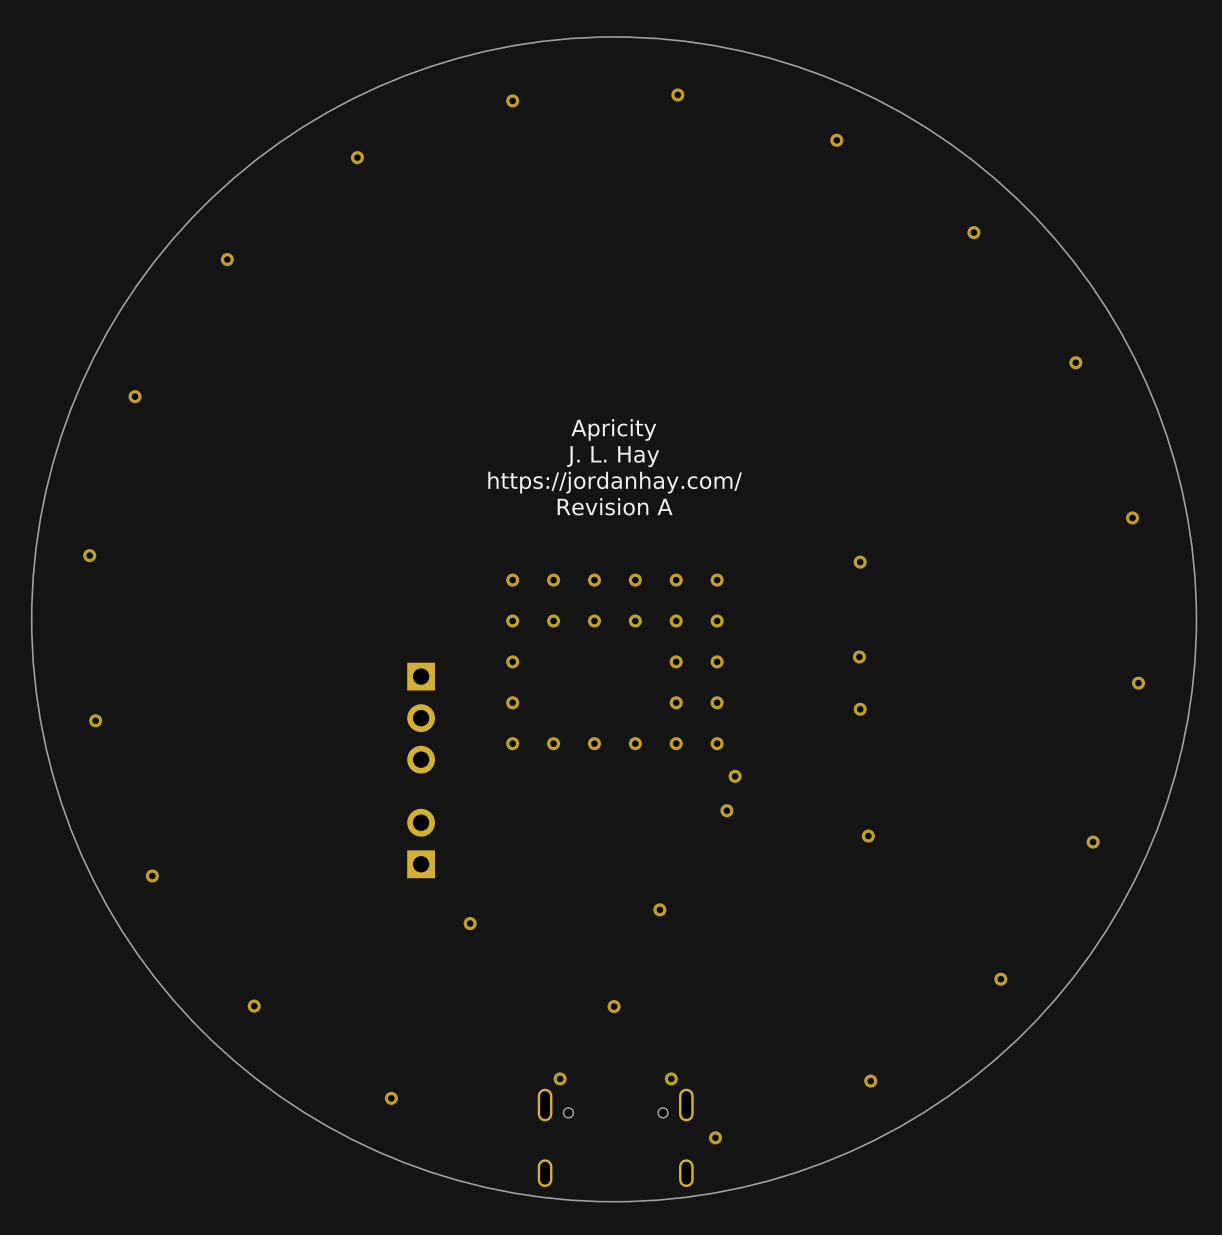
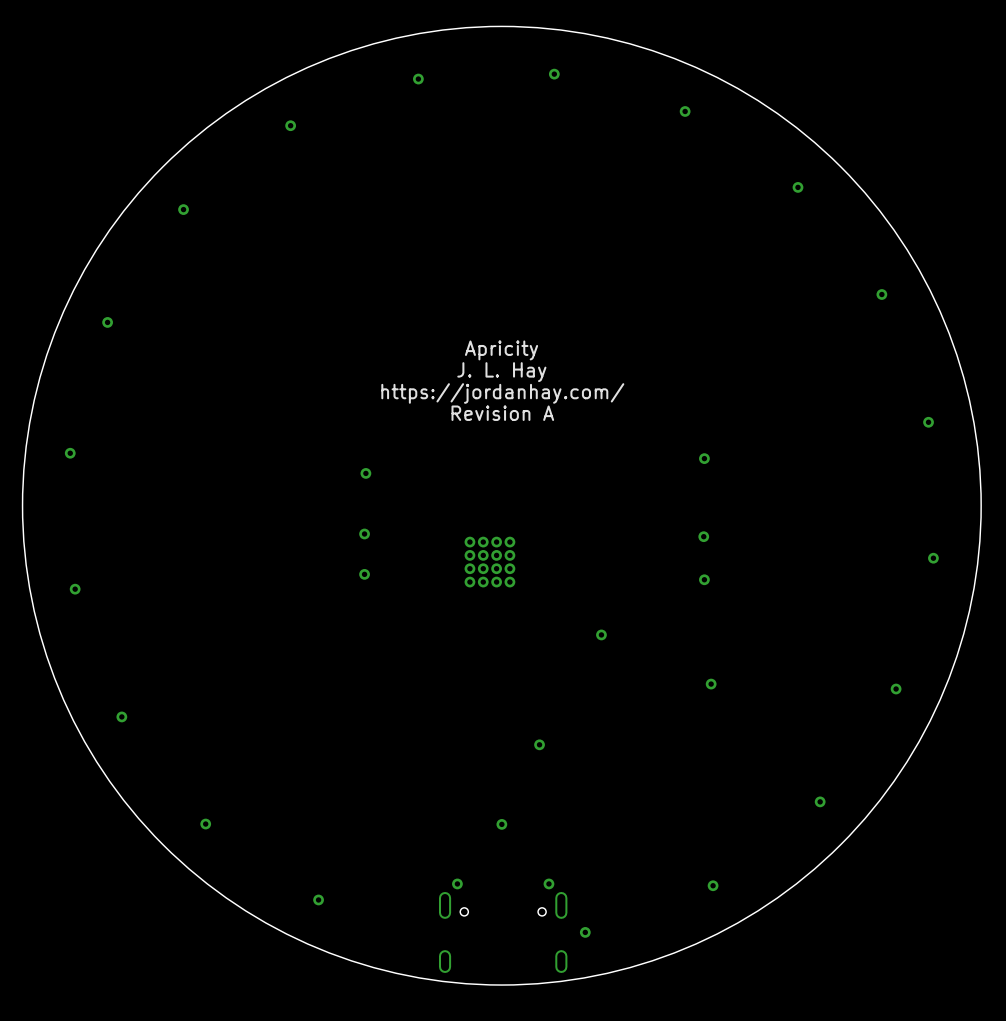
via: none -> (365, 473)
via: (512, 580) -> none
via: (553, 580) -> none
via: (594, 580) -> none
via: (635, 580) -> none
via: (676, 580) -> none
via: (717, 580) -> none
via: (512, 620) -> none
via: (553, 620) -> none
via: (594, 620) -> none
via: (635, 620) -> none
via: (676, 620) -> none
via: (717, 620) -> none
via: none -> (364, 533)
via: (512, 661) -> none
via: (676, 661) -> none
via: (717, 661) -> none
via: none -> (469, 542)
via: none -> (483, 542)
via: none -> (496, 542)
via: none -> (509, 542)
via: none -> (469, 555)
via: none -> (483, 555)
via: none -> (496, 555)
via: none -> (509, 555)
via: none -> (469, 568)
via: none -> (483, 568)
via: none -> (496, 568)
via: none -> (509, 568)
via: none -> (364, 574)
via: (512, 702) -> none
via: (676, 702) -> none
via: (717, 702) -> none
via: none -> (469, 582)
via: none -> (483, 582)
via: none -> (496, 582)
via: none -> (509, 582)
part: (421, 718) -> none
via: (512, 743) -> none
via: (553, 743) -> none
via: (594, 743) -> none
via: (635, 743) -> none
via: (676, 743) -> none
via: (717, 743) -> none
via: (726, 810) -> none
part: (421, 843) -> none
via: (470, 923) -> none

